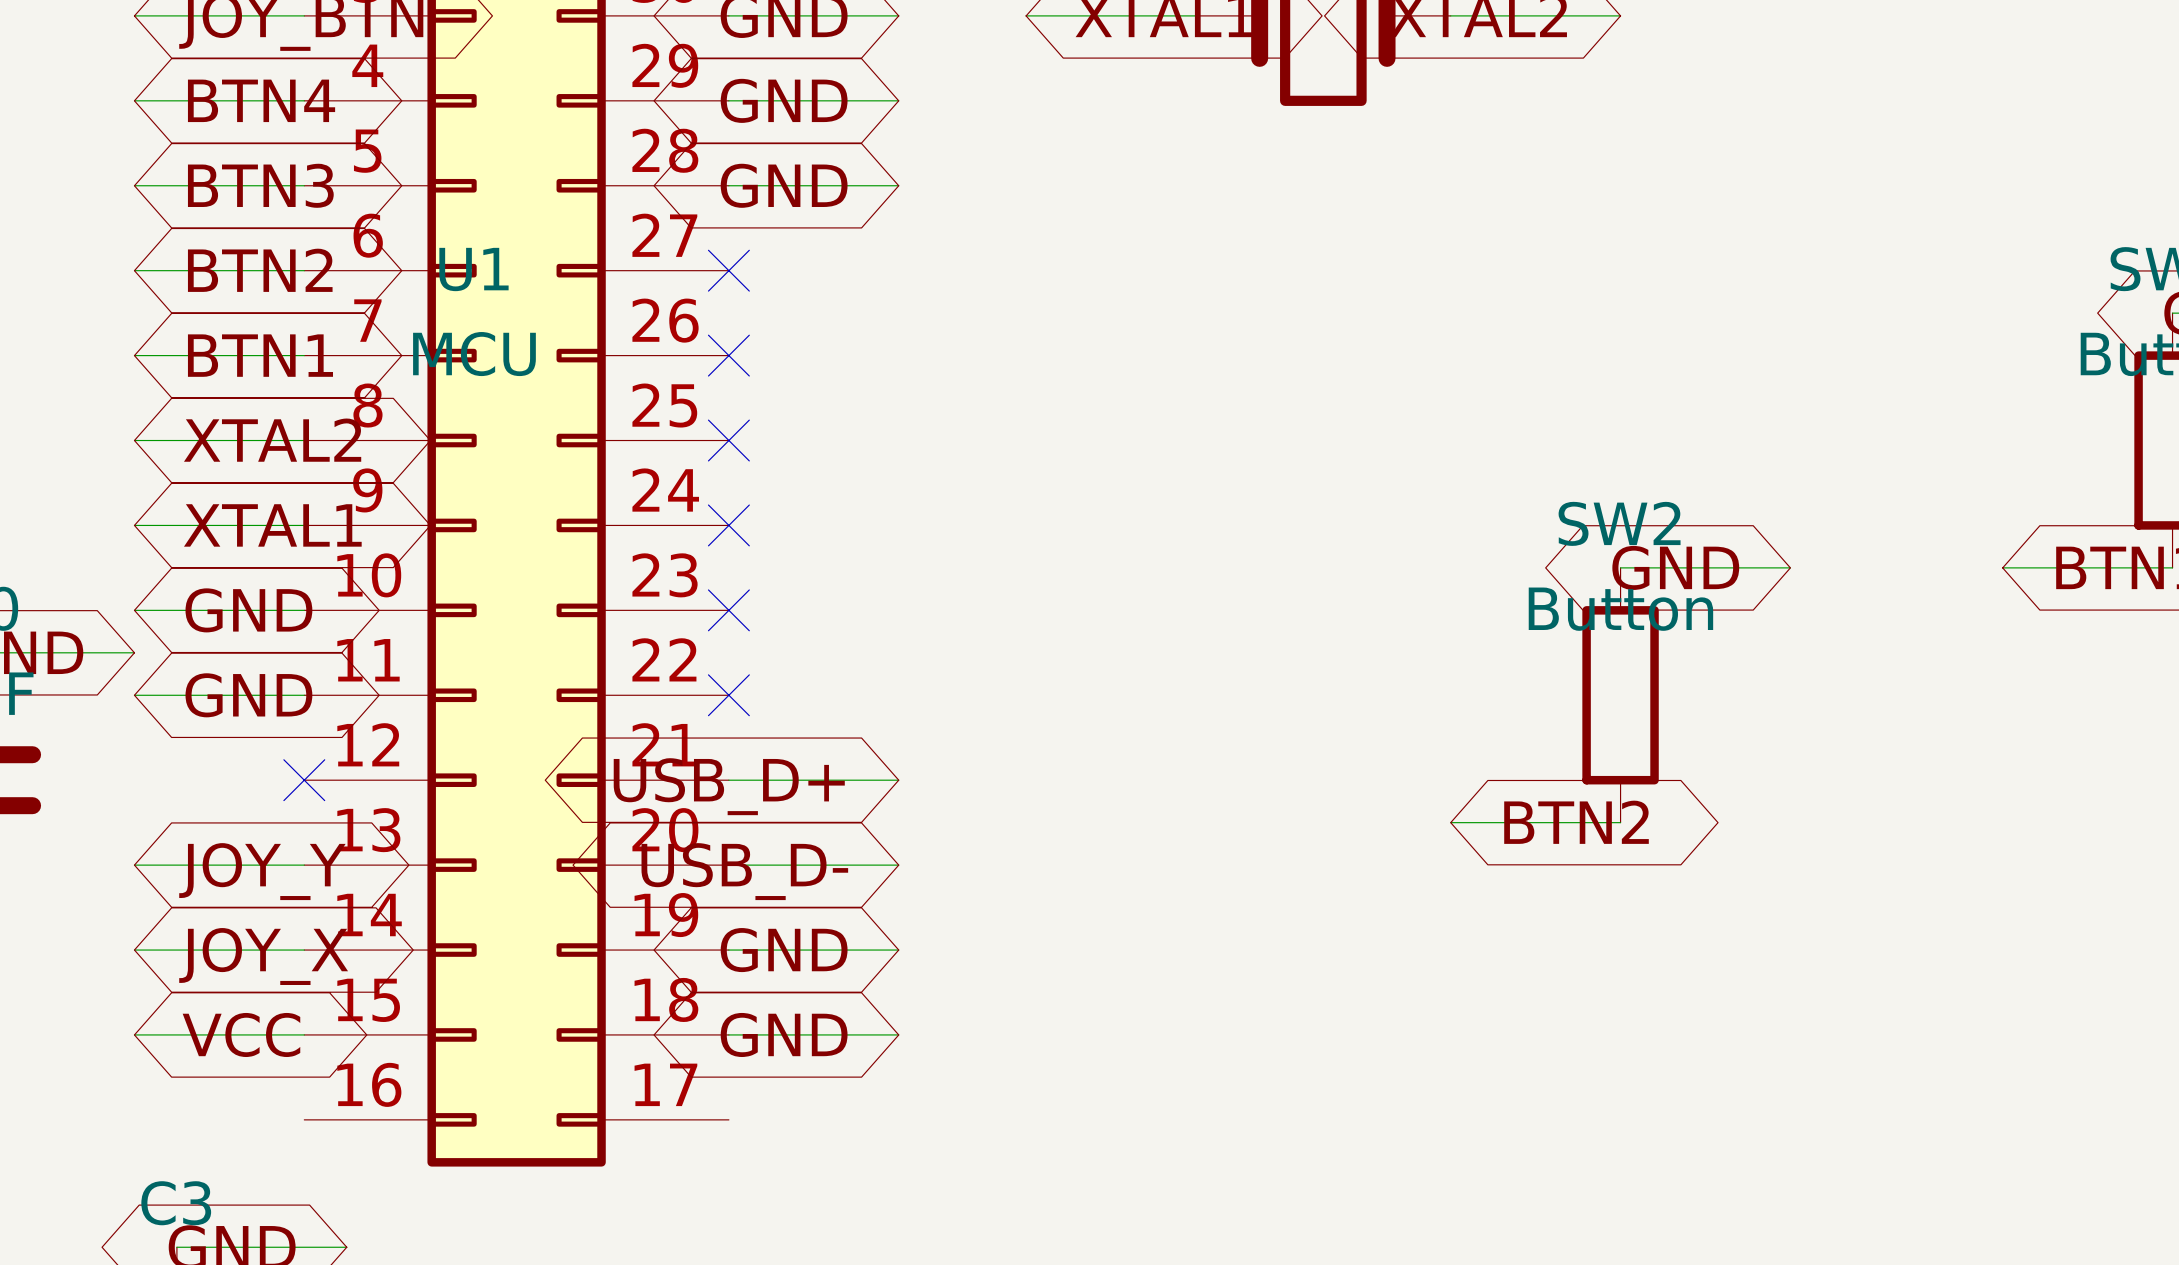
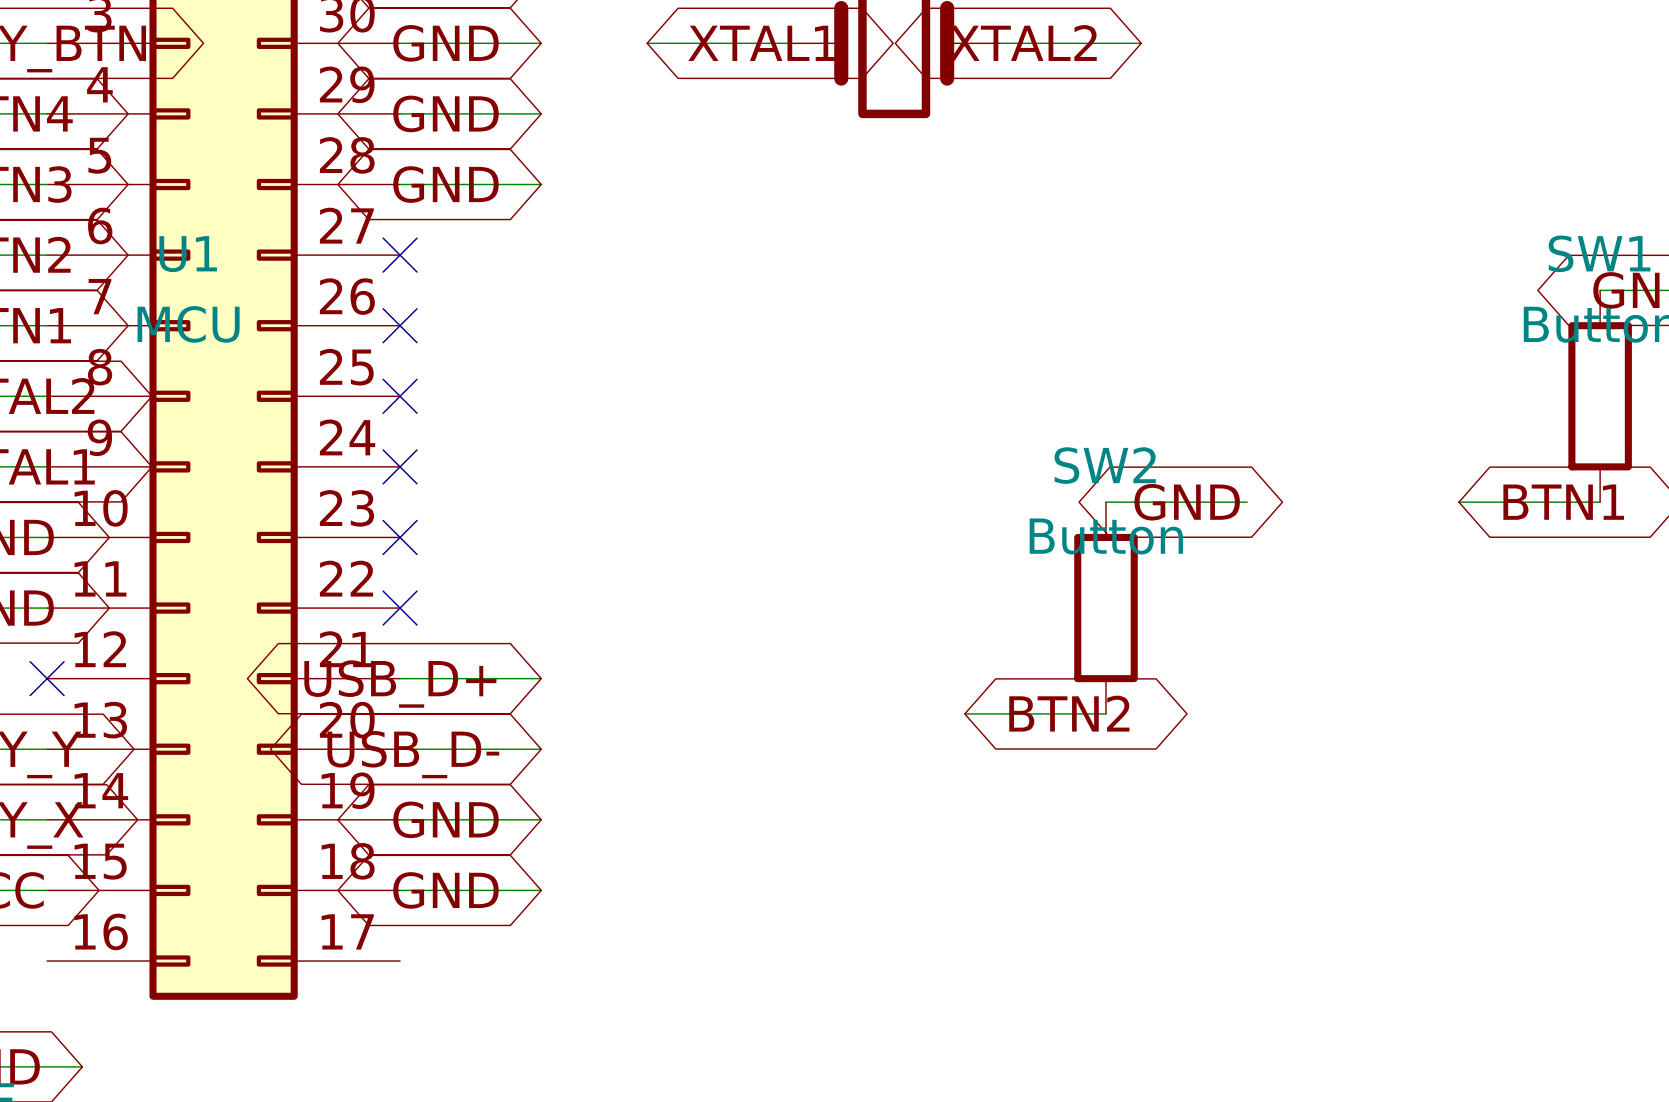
wire: (1747, 567) (1790, 567) -> (1105, 502) (1141, 502)
SW2 position: (1620, 695) -> (1105, 608)
global label position: BTN2 (1576, 822) -> BTN2 (1069, 713)
wire: (1578, 822) (1620, 822) -> (964, 713) (1000, 713)

